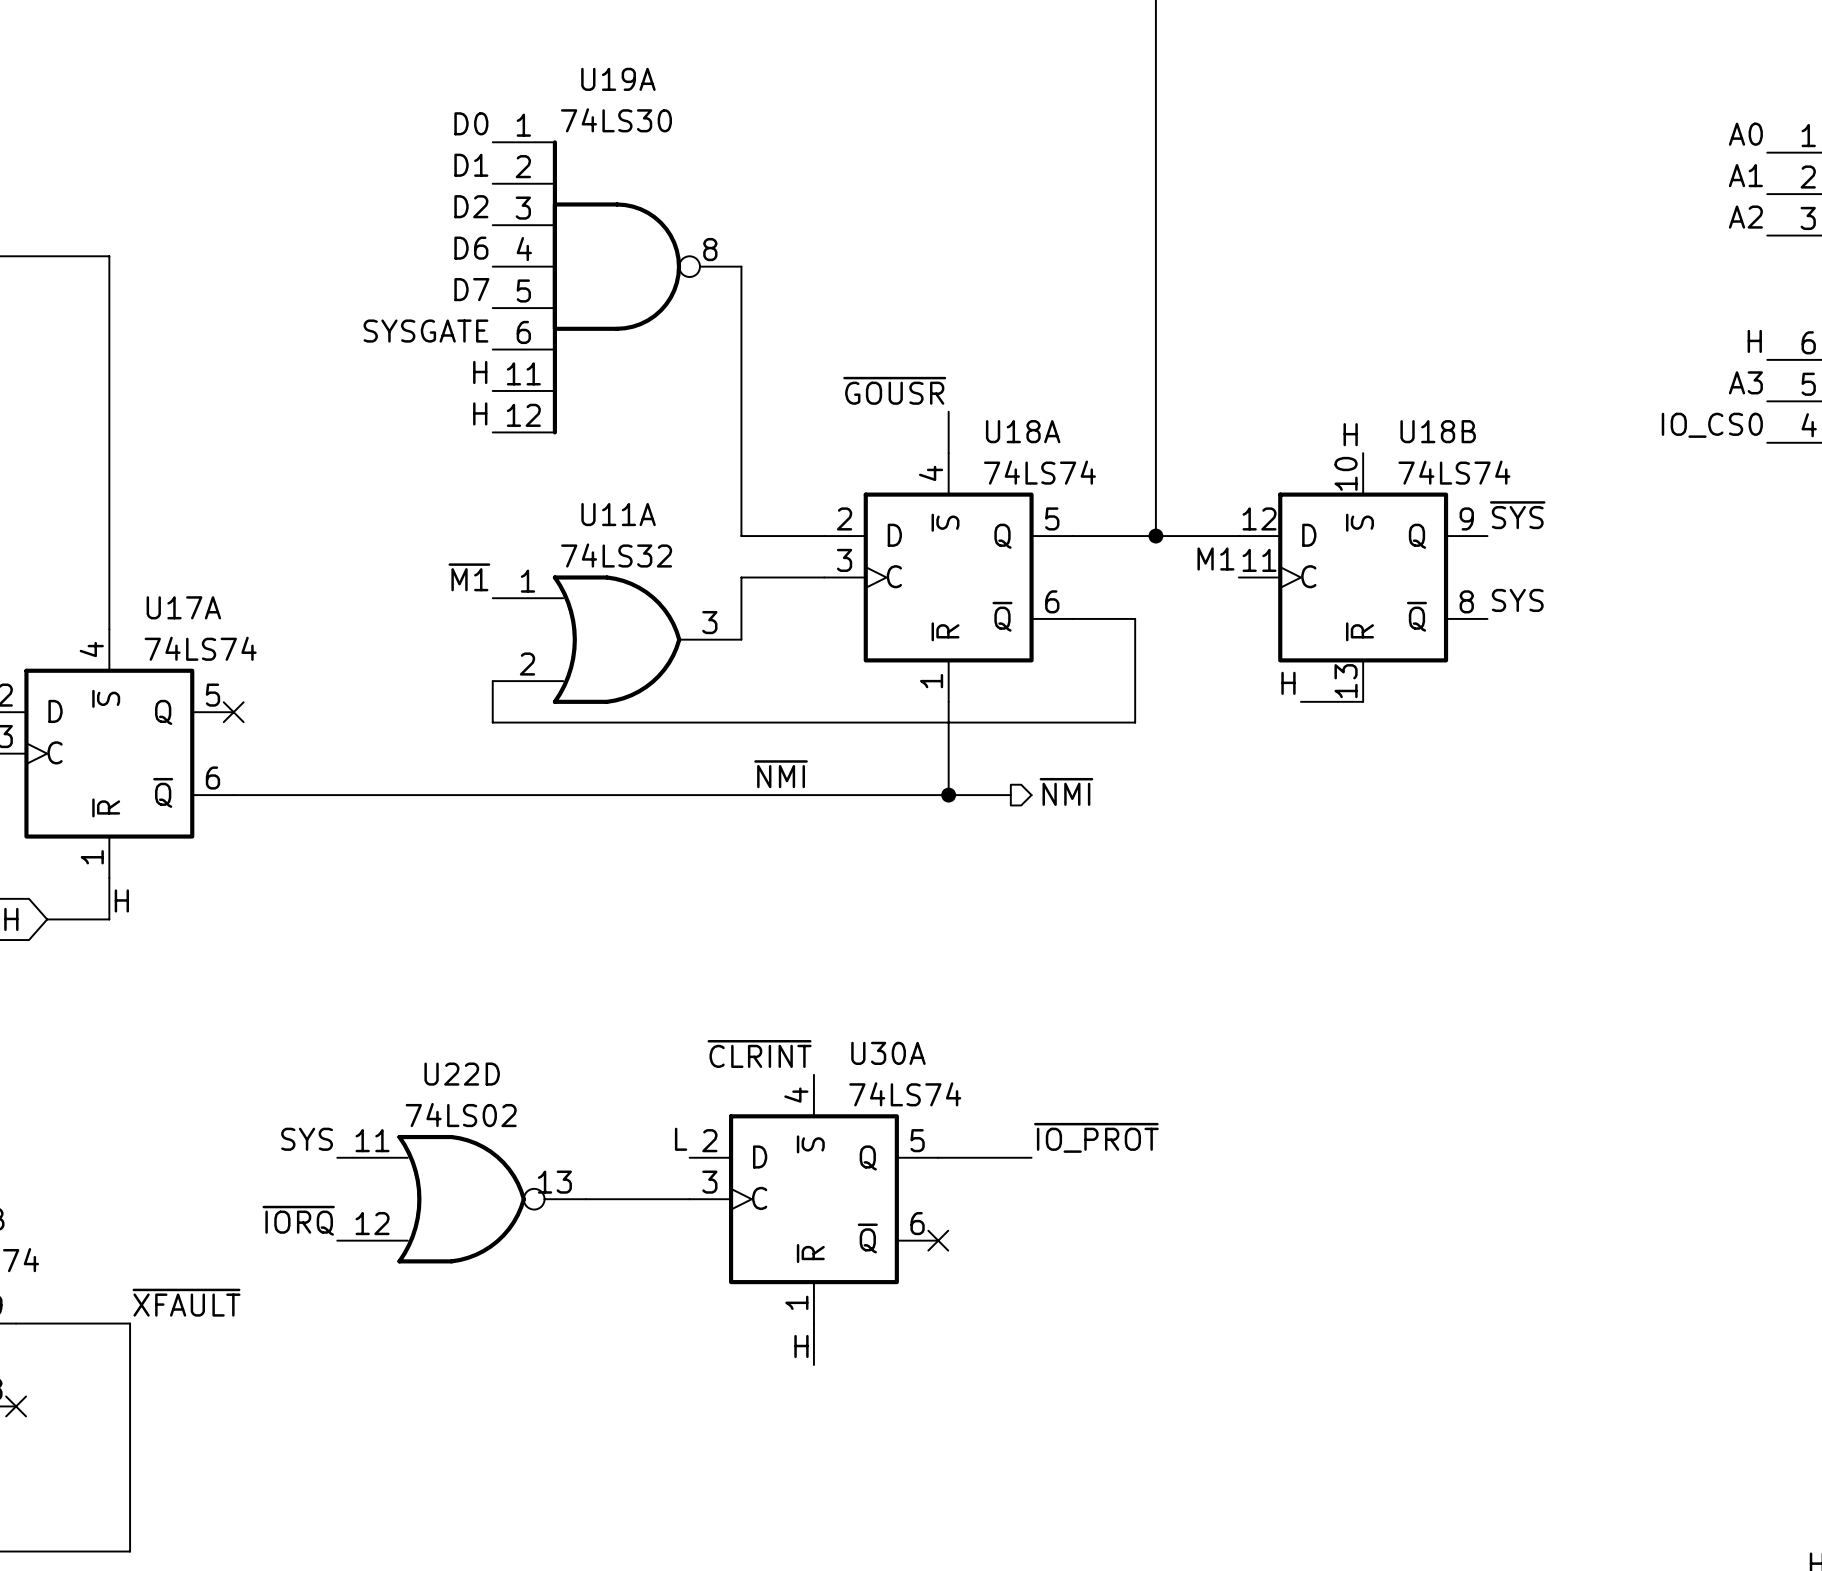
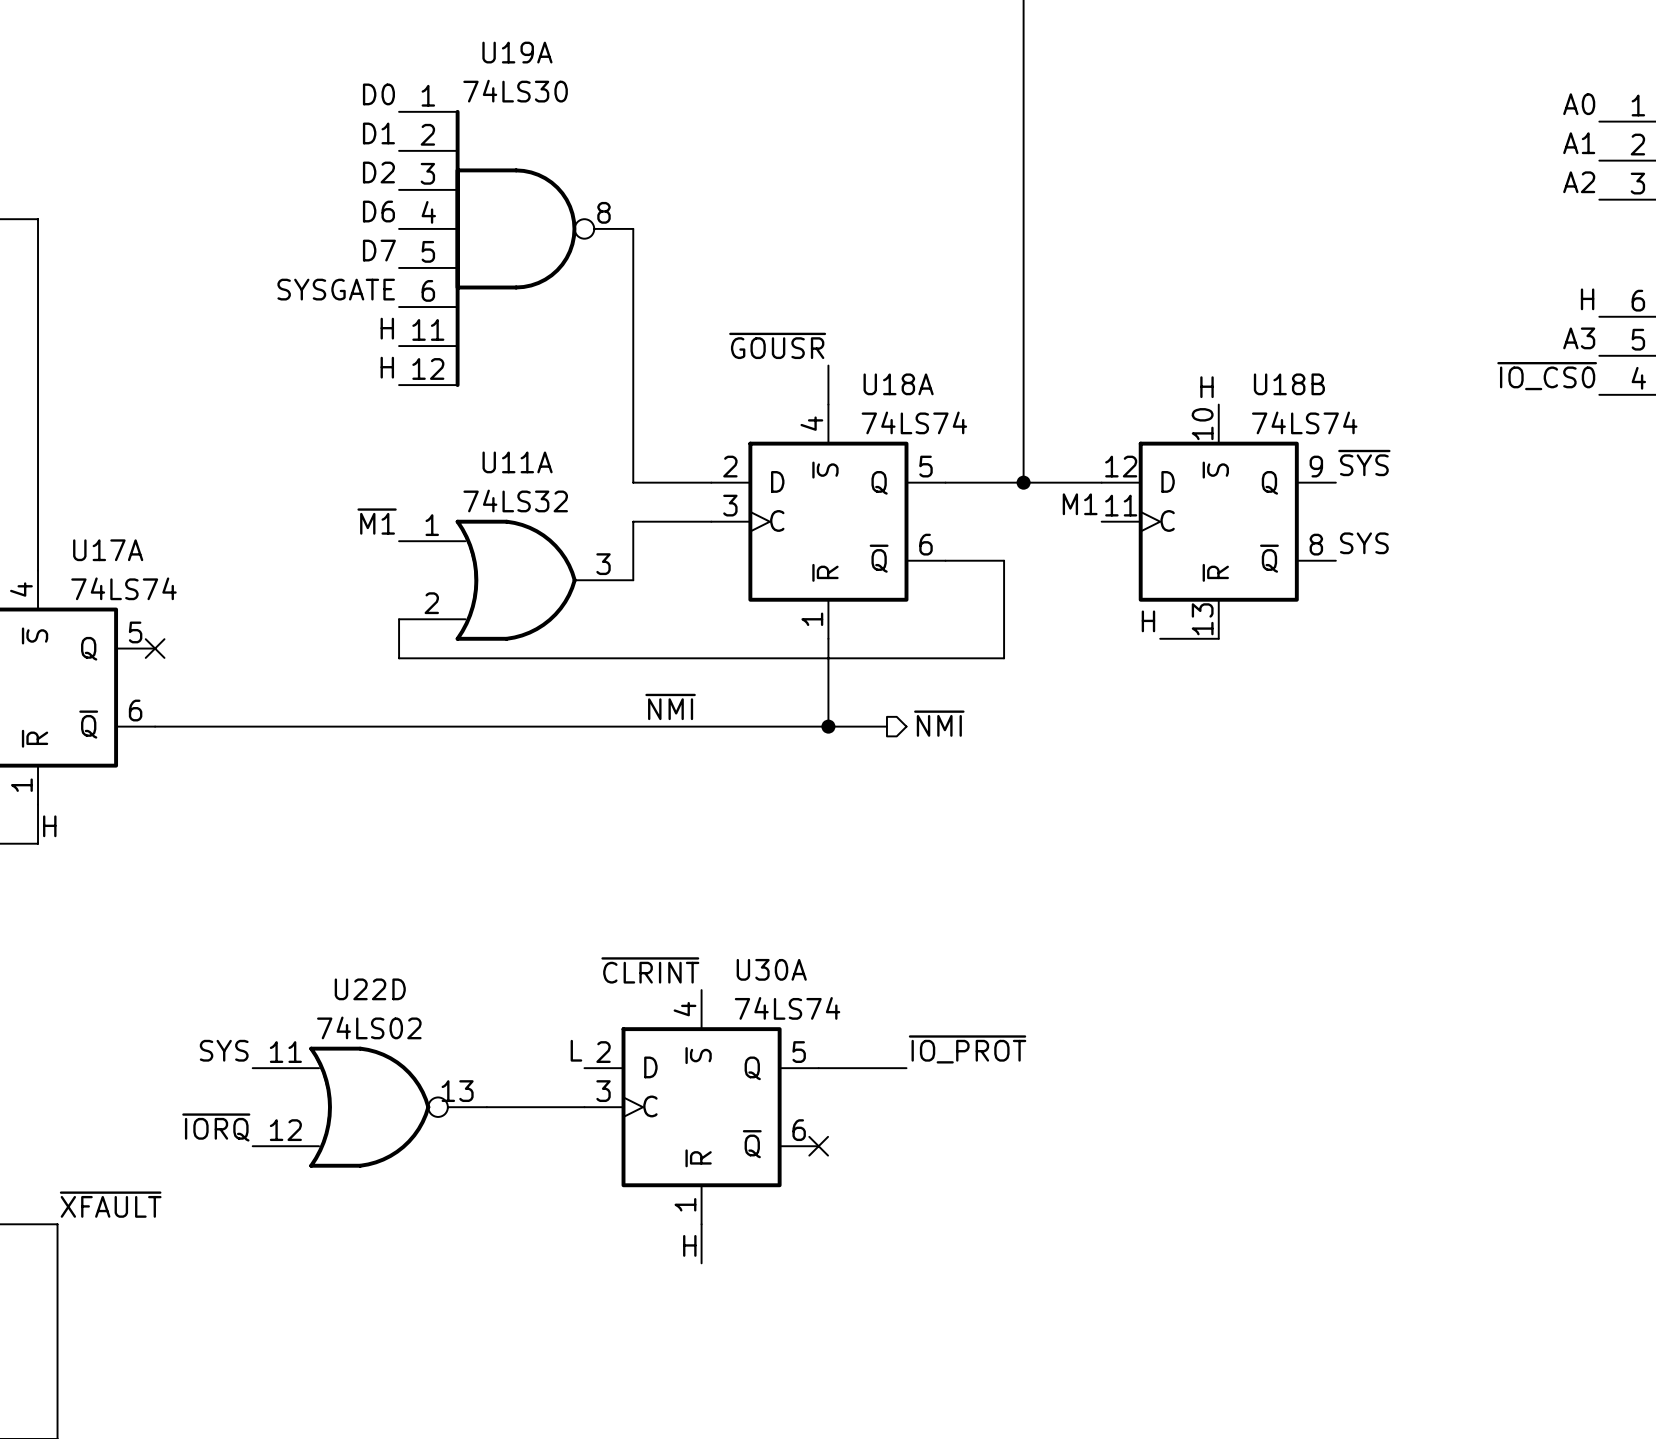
label: IO_CS0 (1712, 425) -> ~{IO_CS0} (1547, 376)

